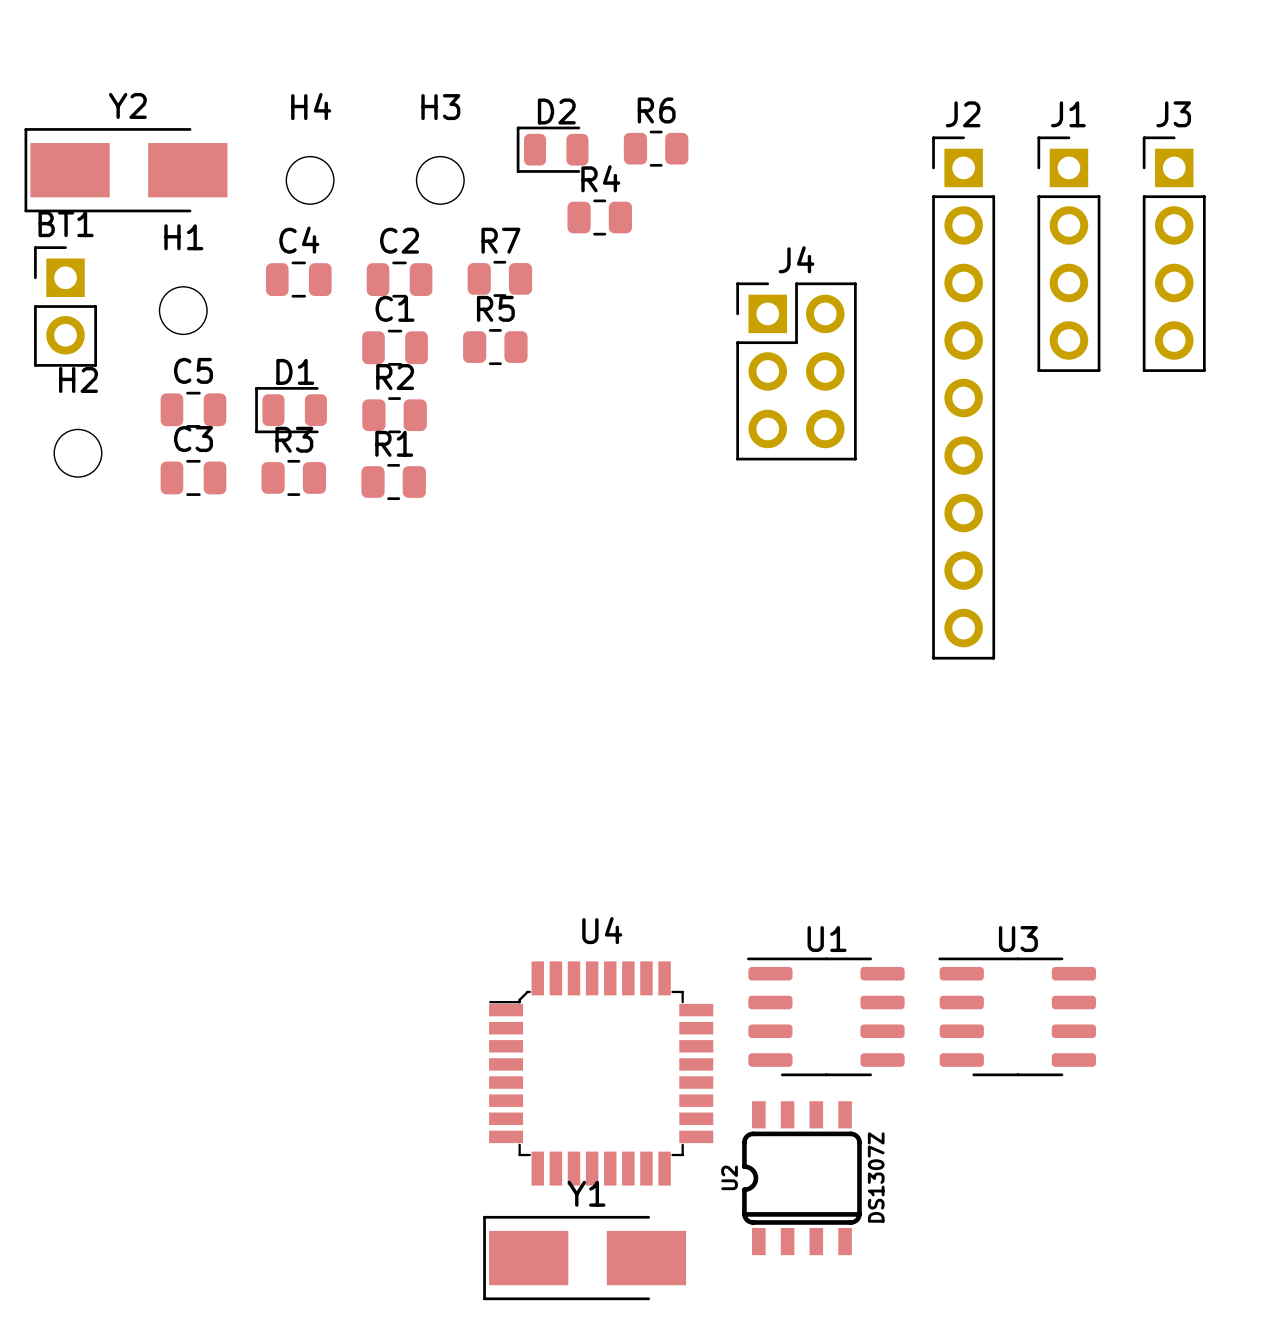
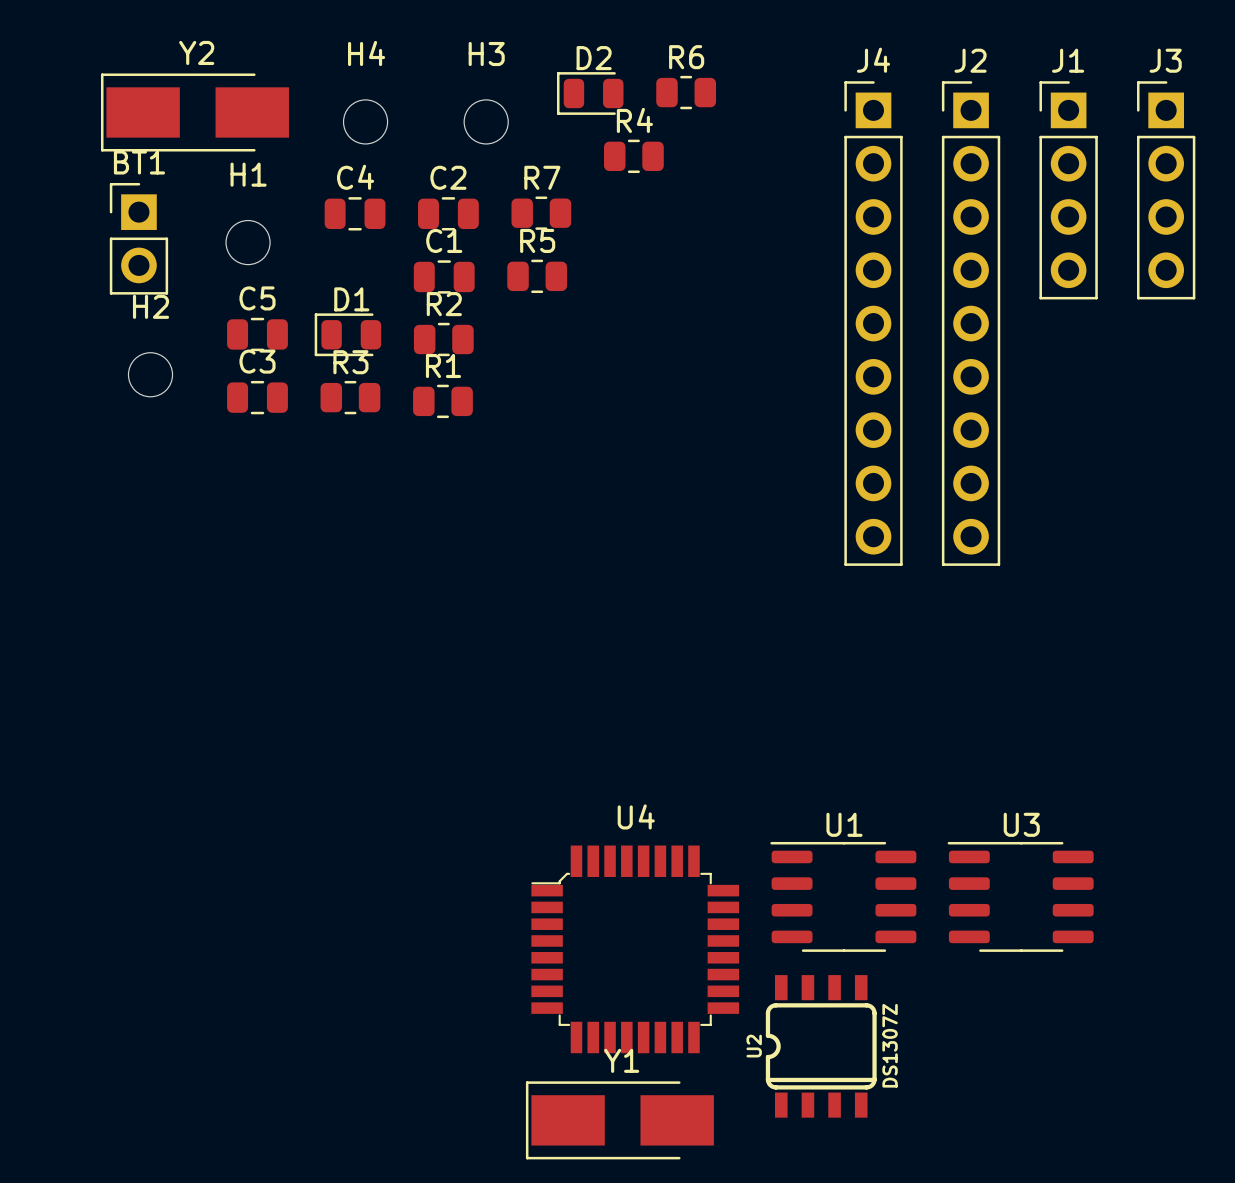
J4 name position: J4 (796, 259) -> J4 (873, 60)
J4 footprint: [736, 282, 857, 461] -> [844, 81, 903, 566]

